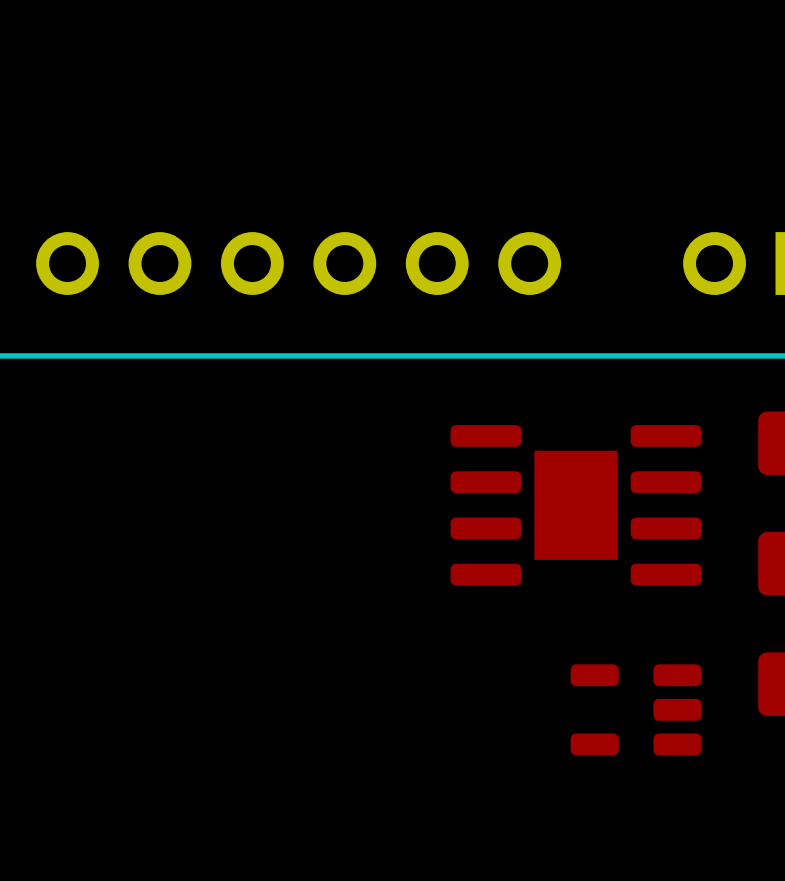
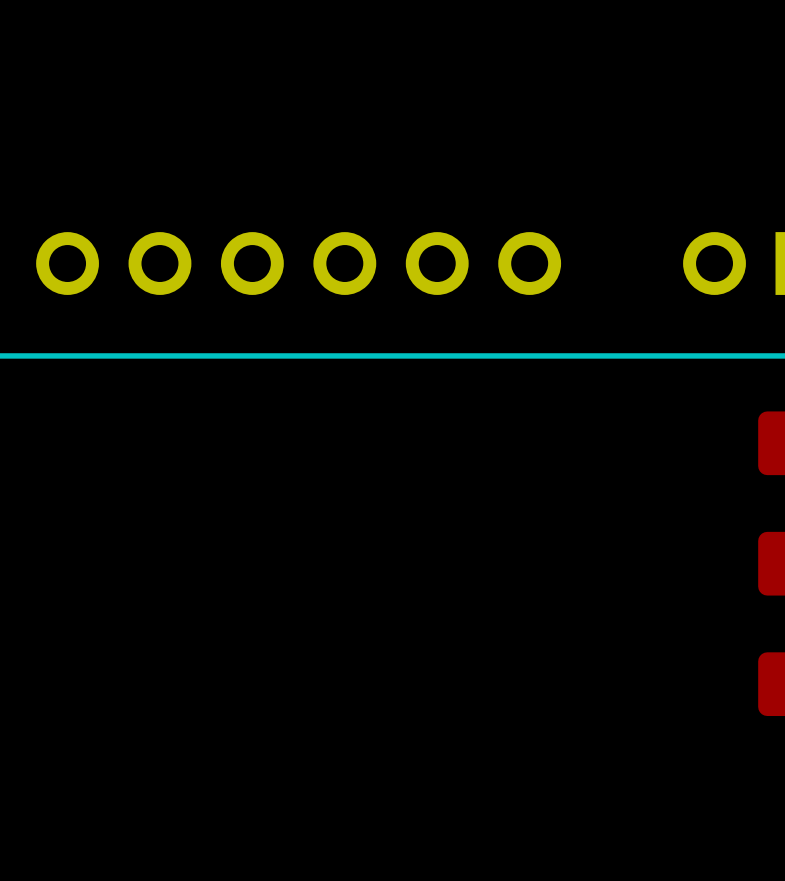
part: (576, 505) -> none
part: (636, 709) -> none

